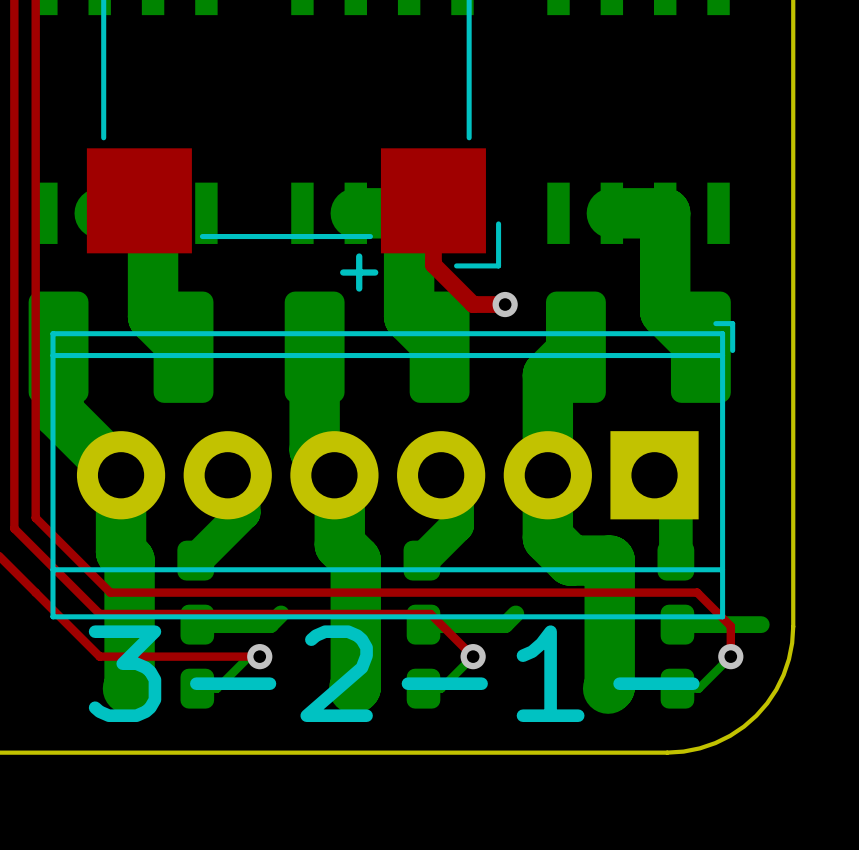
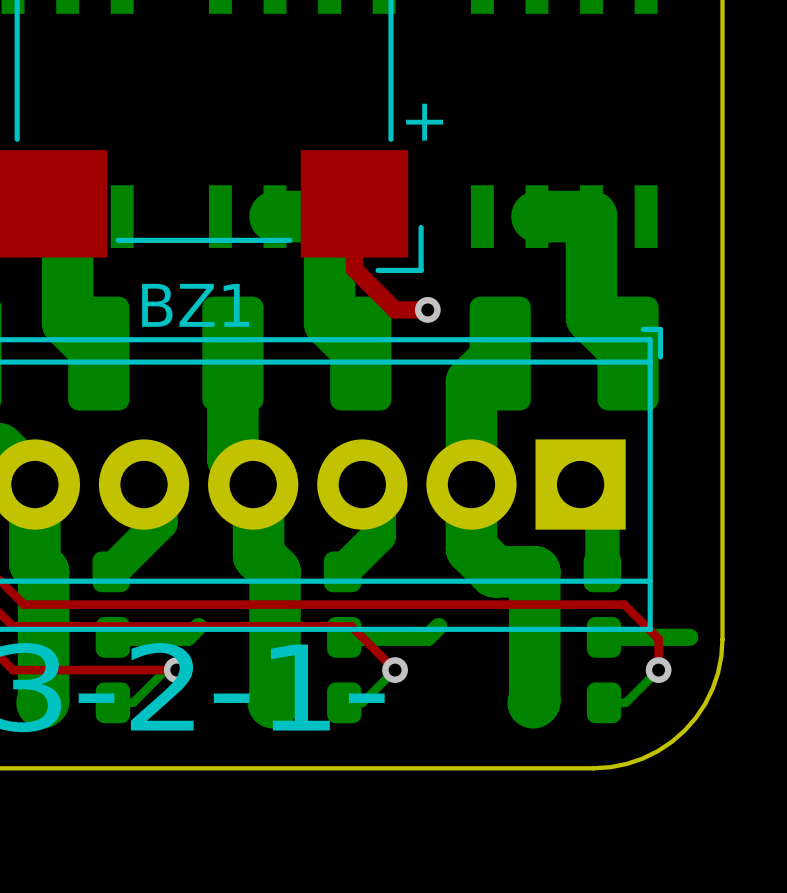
BZ1 text position: + (359, 272) -> + (424, 122)
BZ1 name: none -> BZ1 (195, 305)

